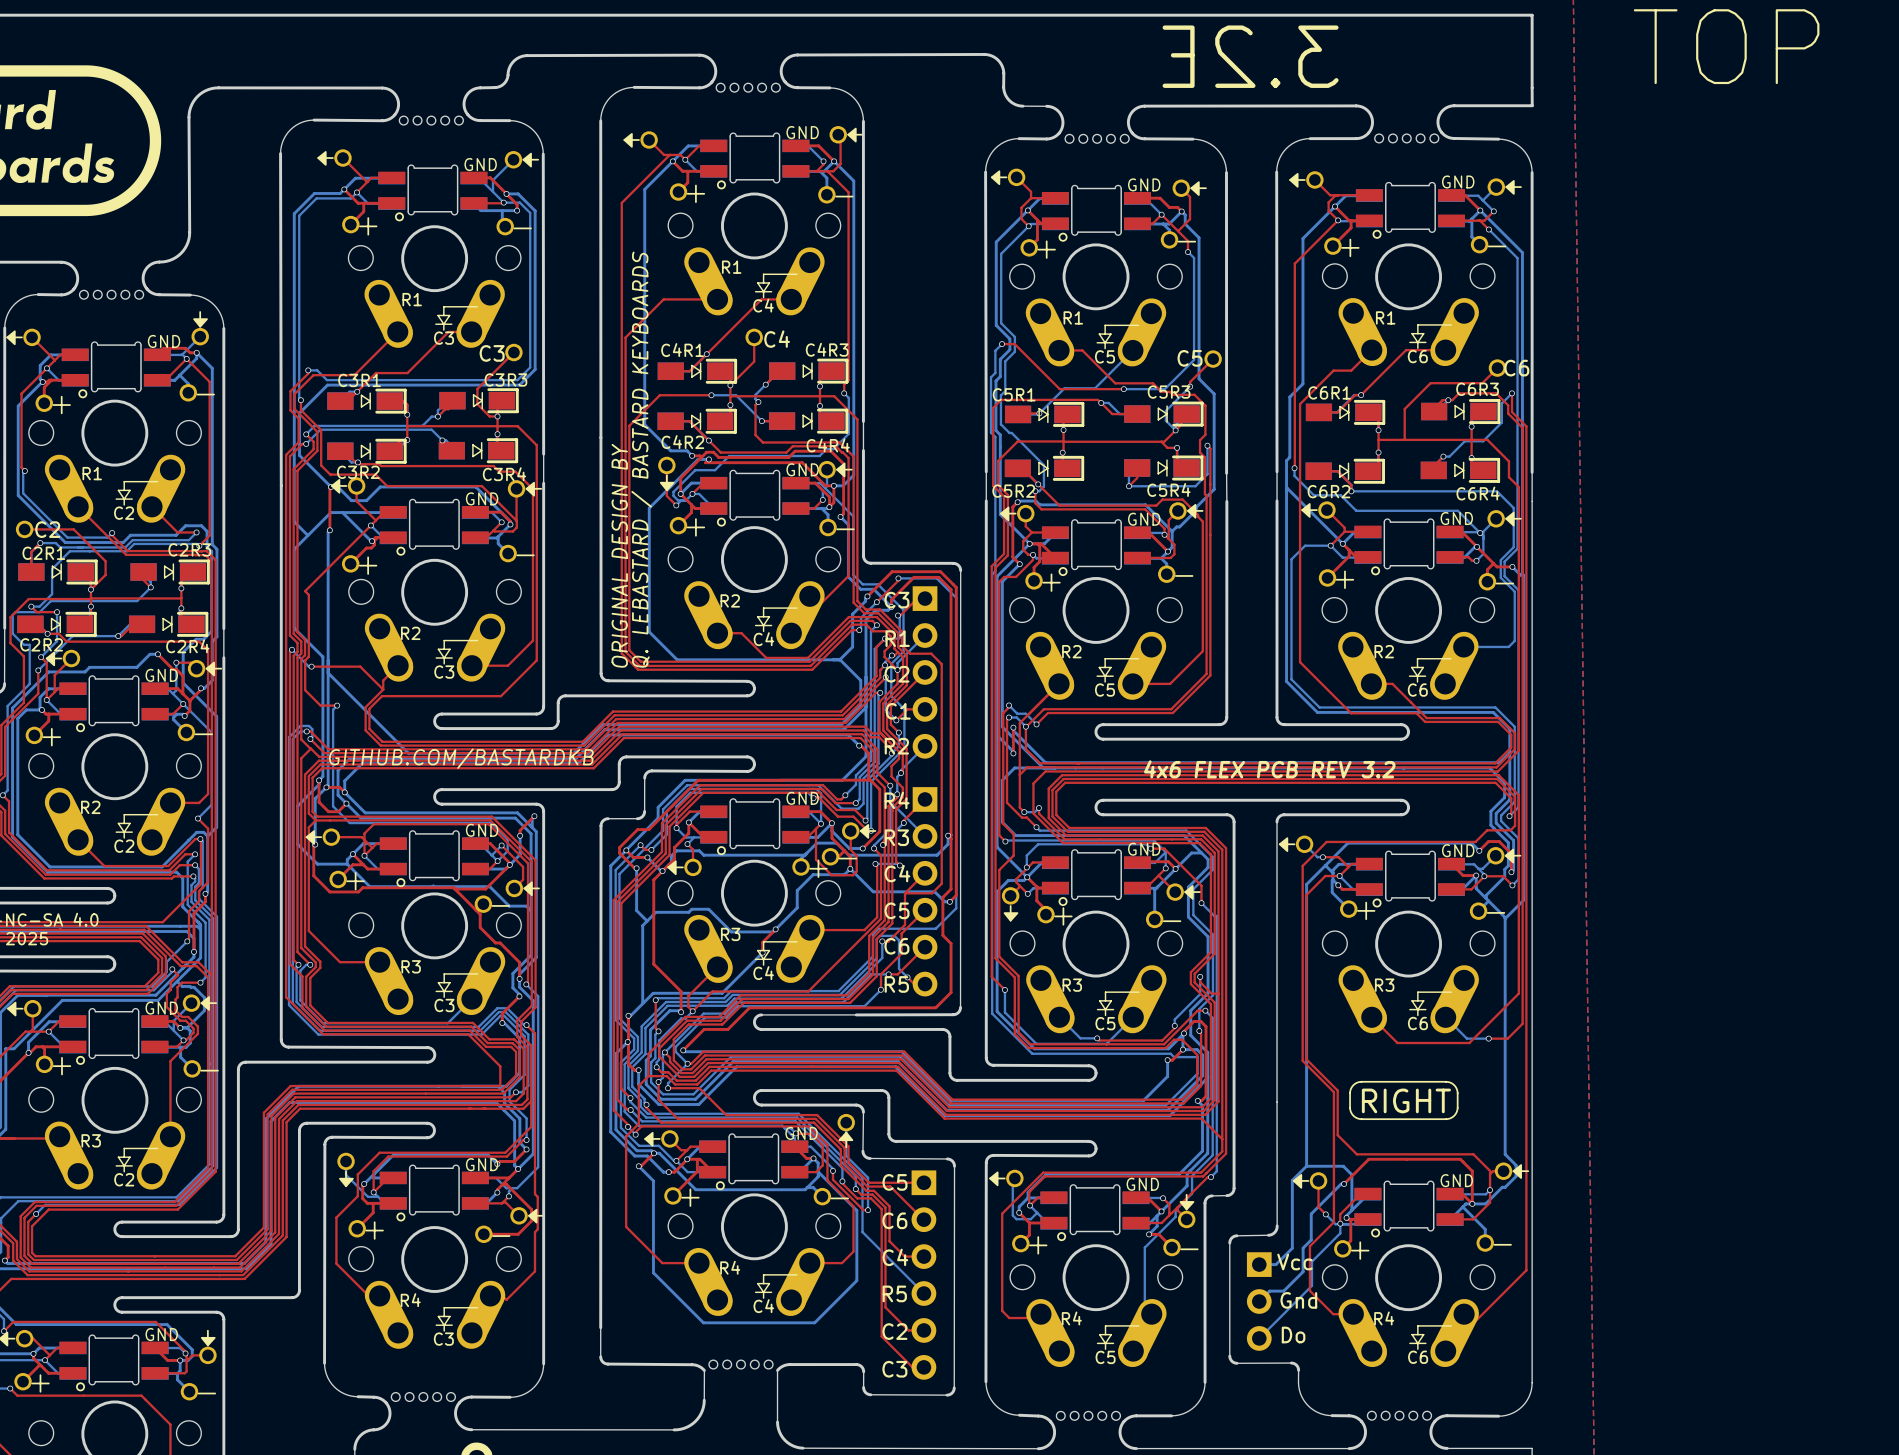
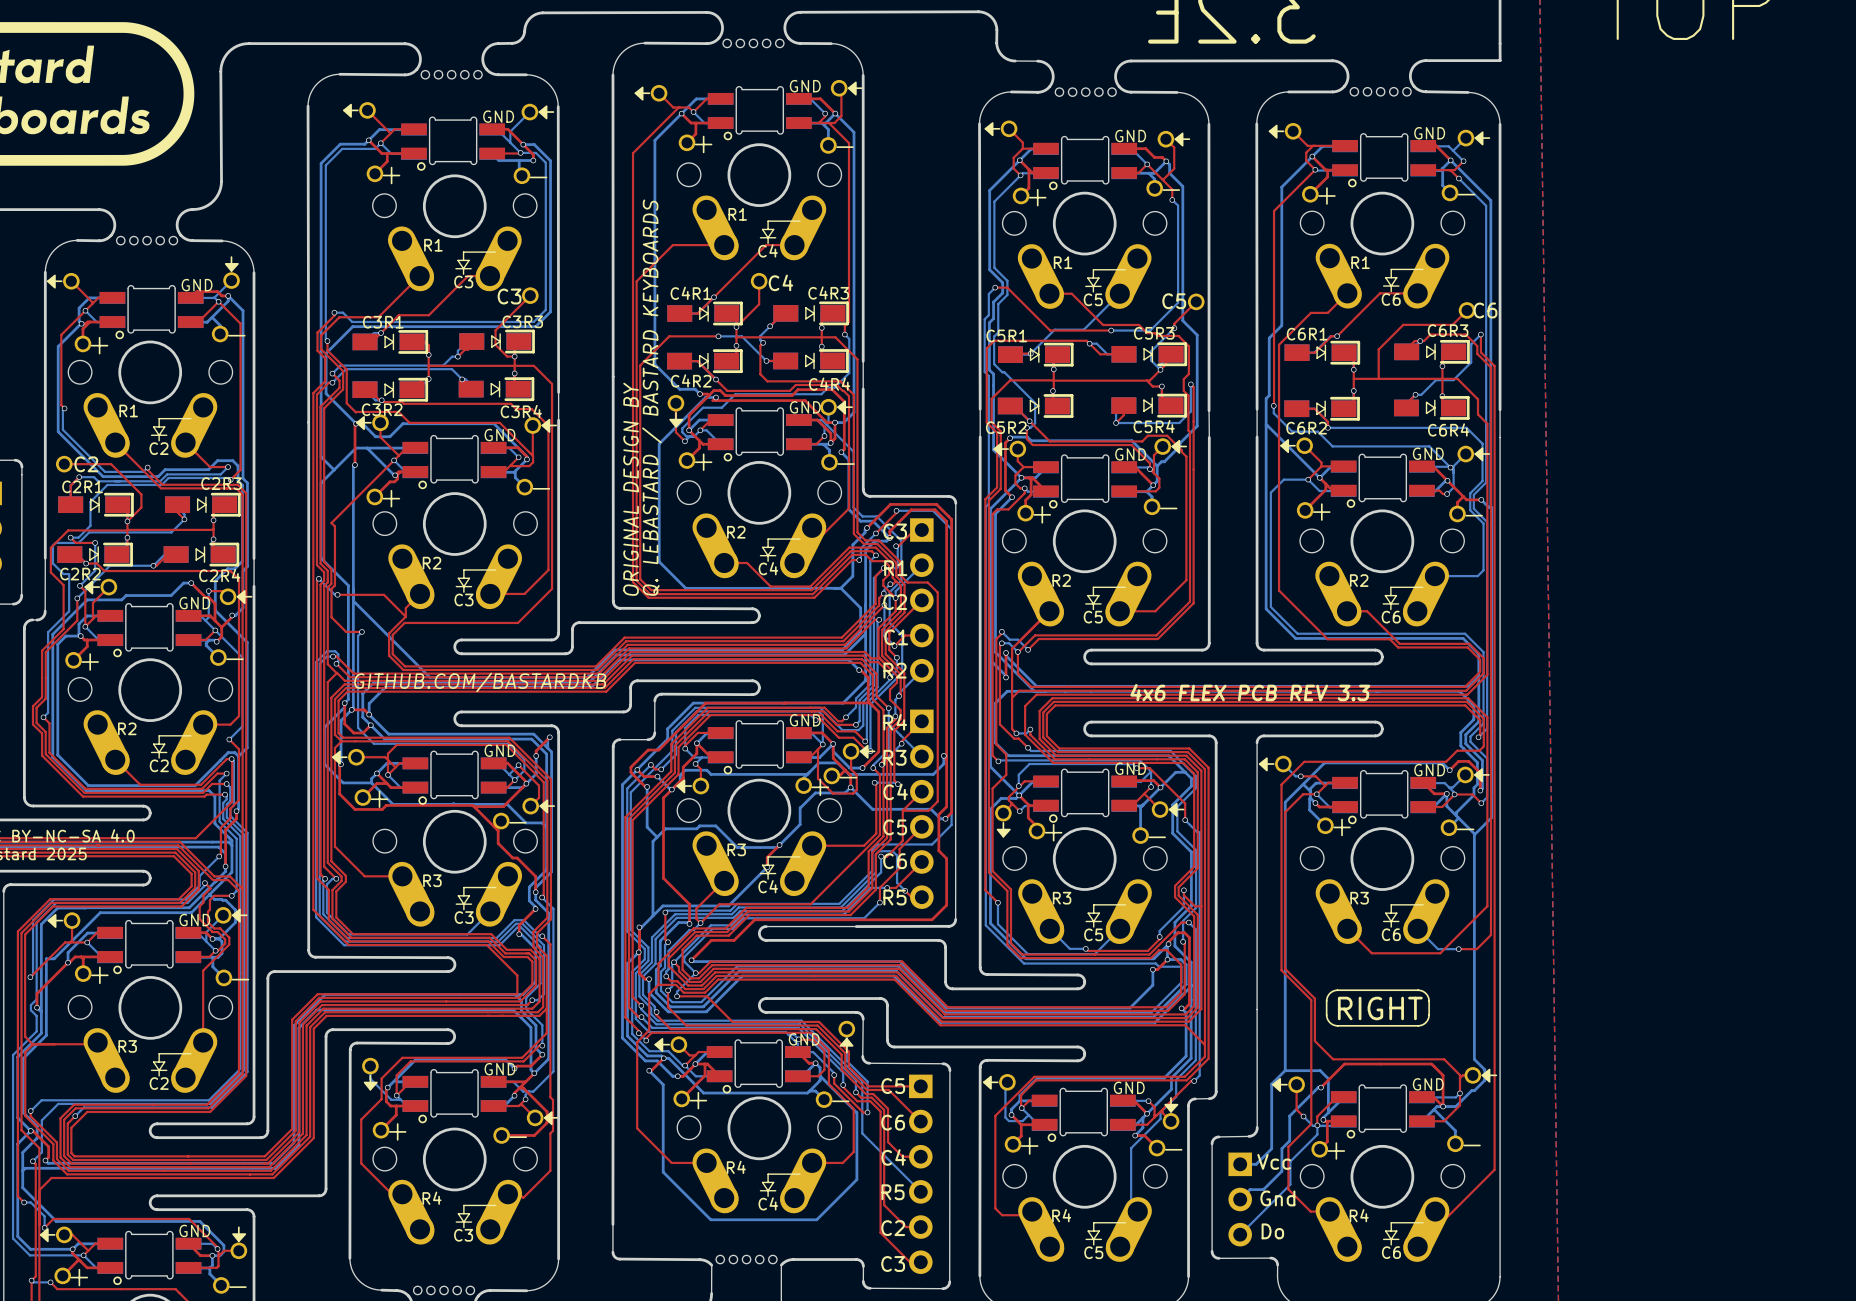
text: 4x6 FLEX PCB REV 3.2 (1269, 769) -> 4x6 FLEX PCB REV 3.3 (1250, 692)

